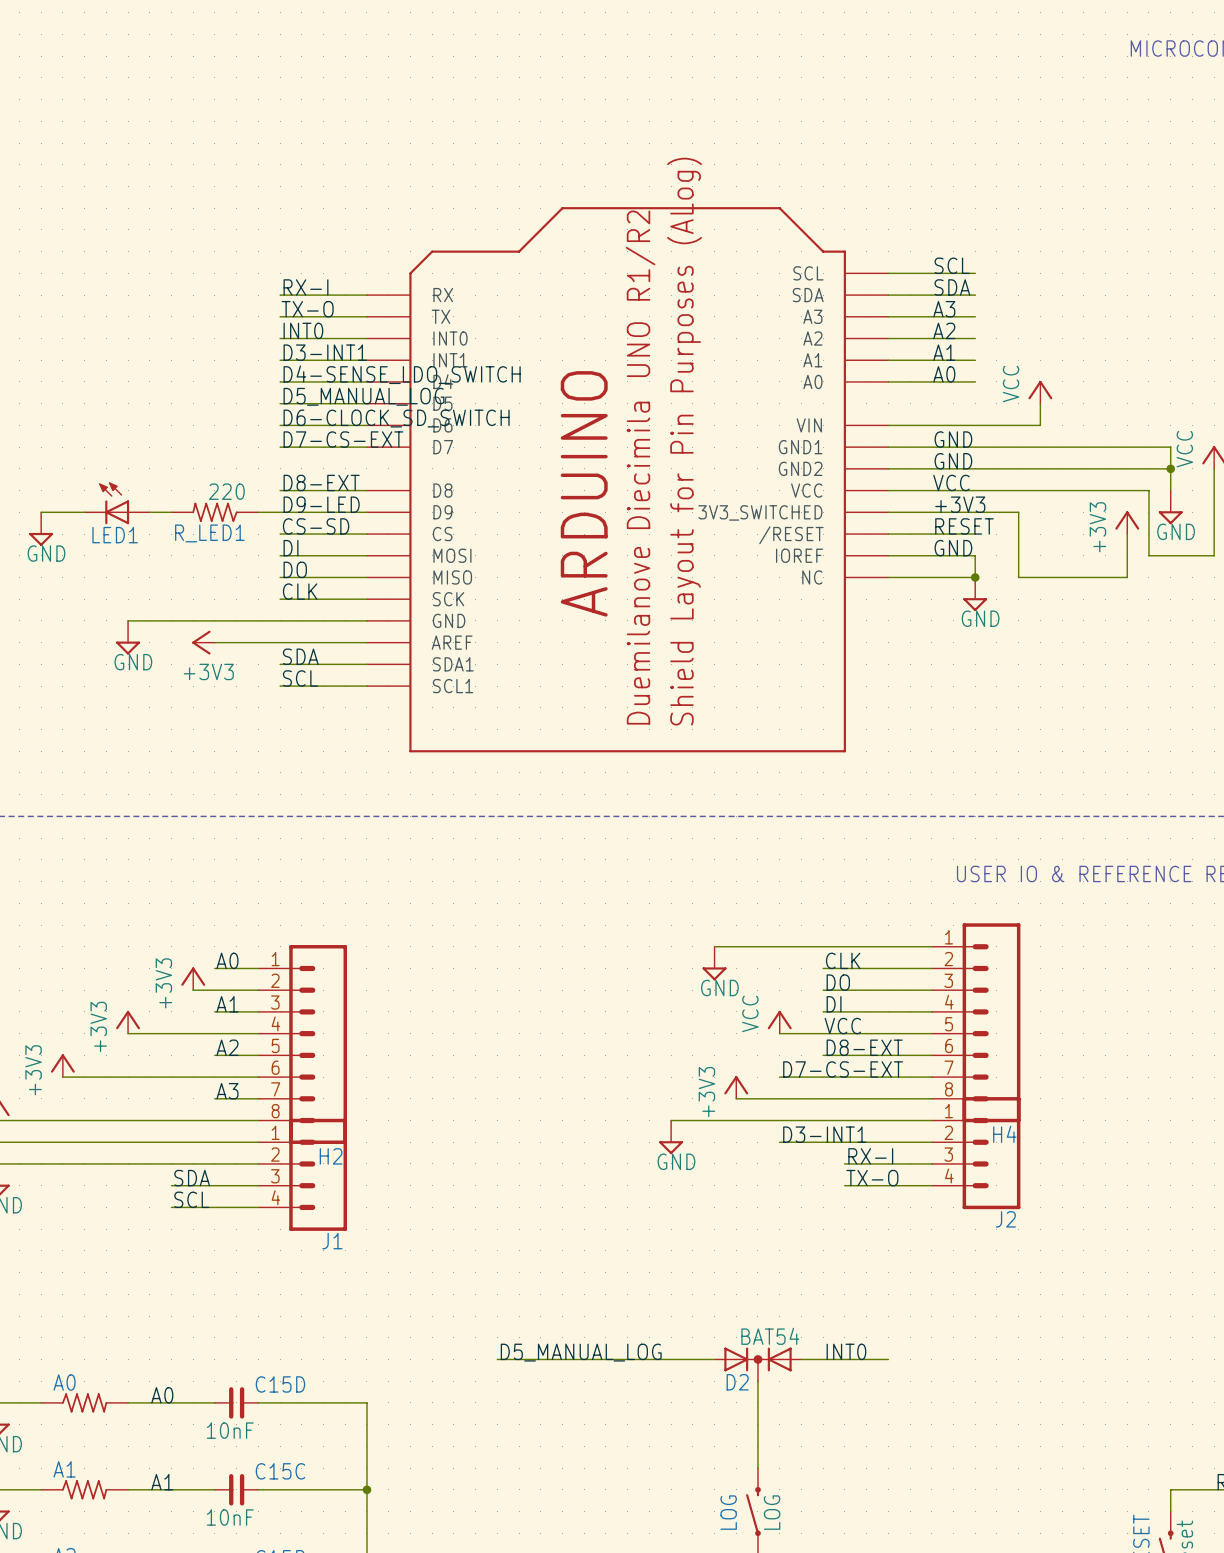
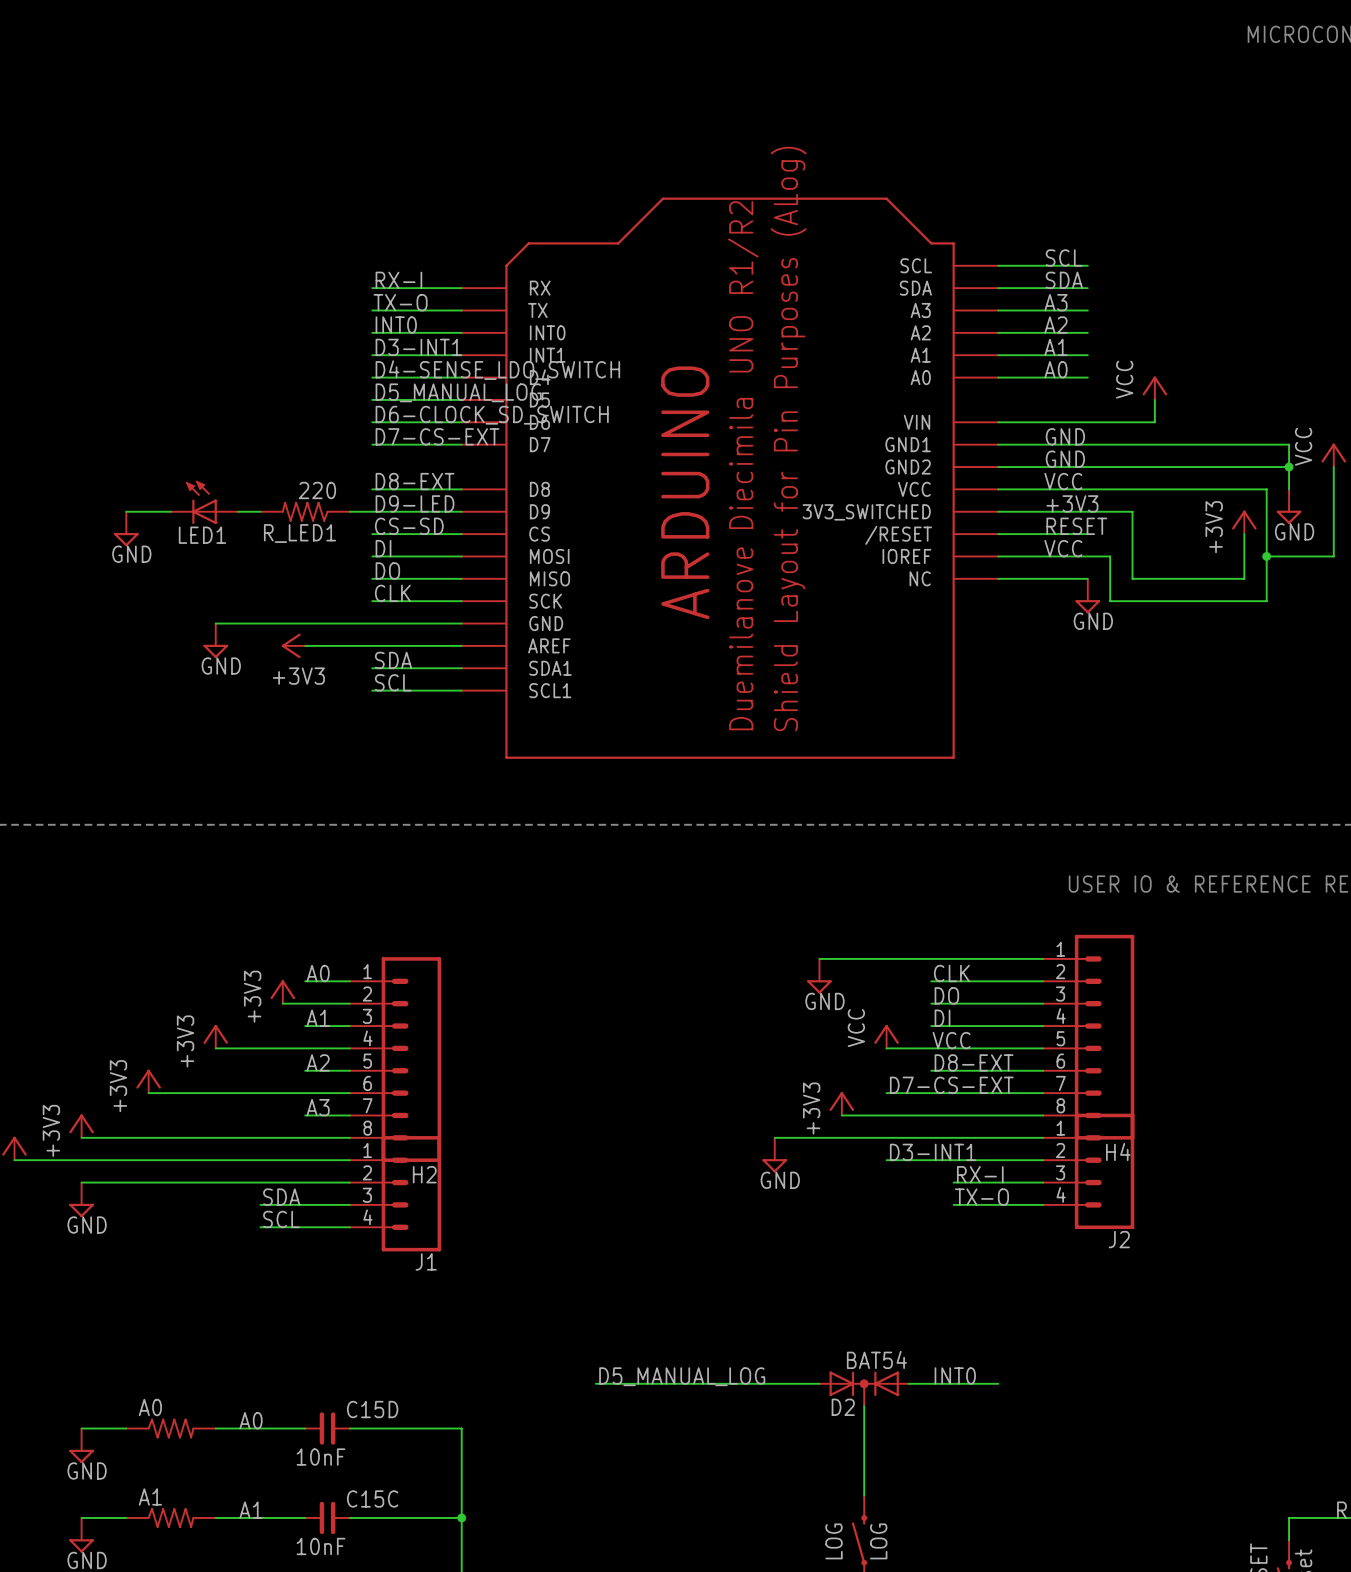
label: GND (953, 548) -> VCC (1063, 548)
wire: (975, 555) (975, 577) -> (1087, 556) (1110, 556) (1110, 601) (1266, 601) (1266, 556)
junction: none -> (1266, 556)
junction: (975, 577) -> none

